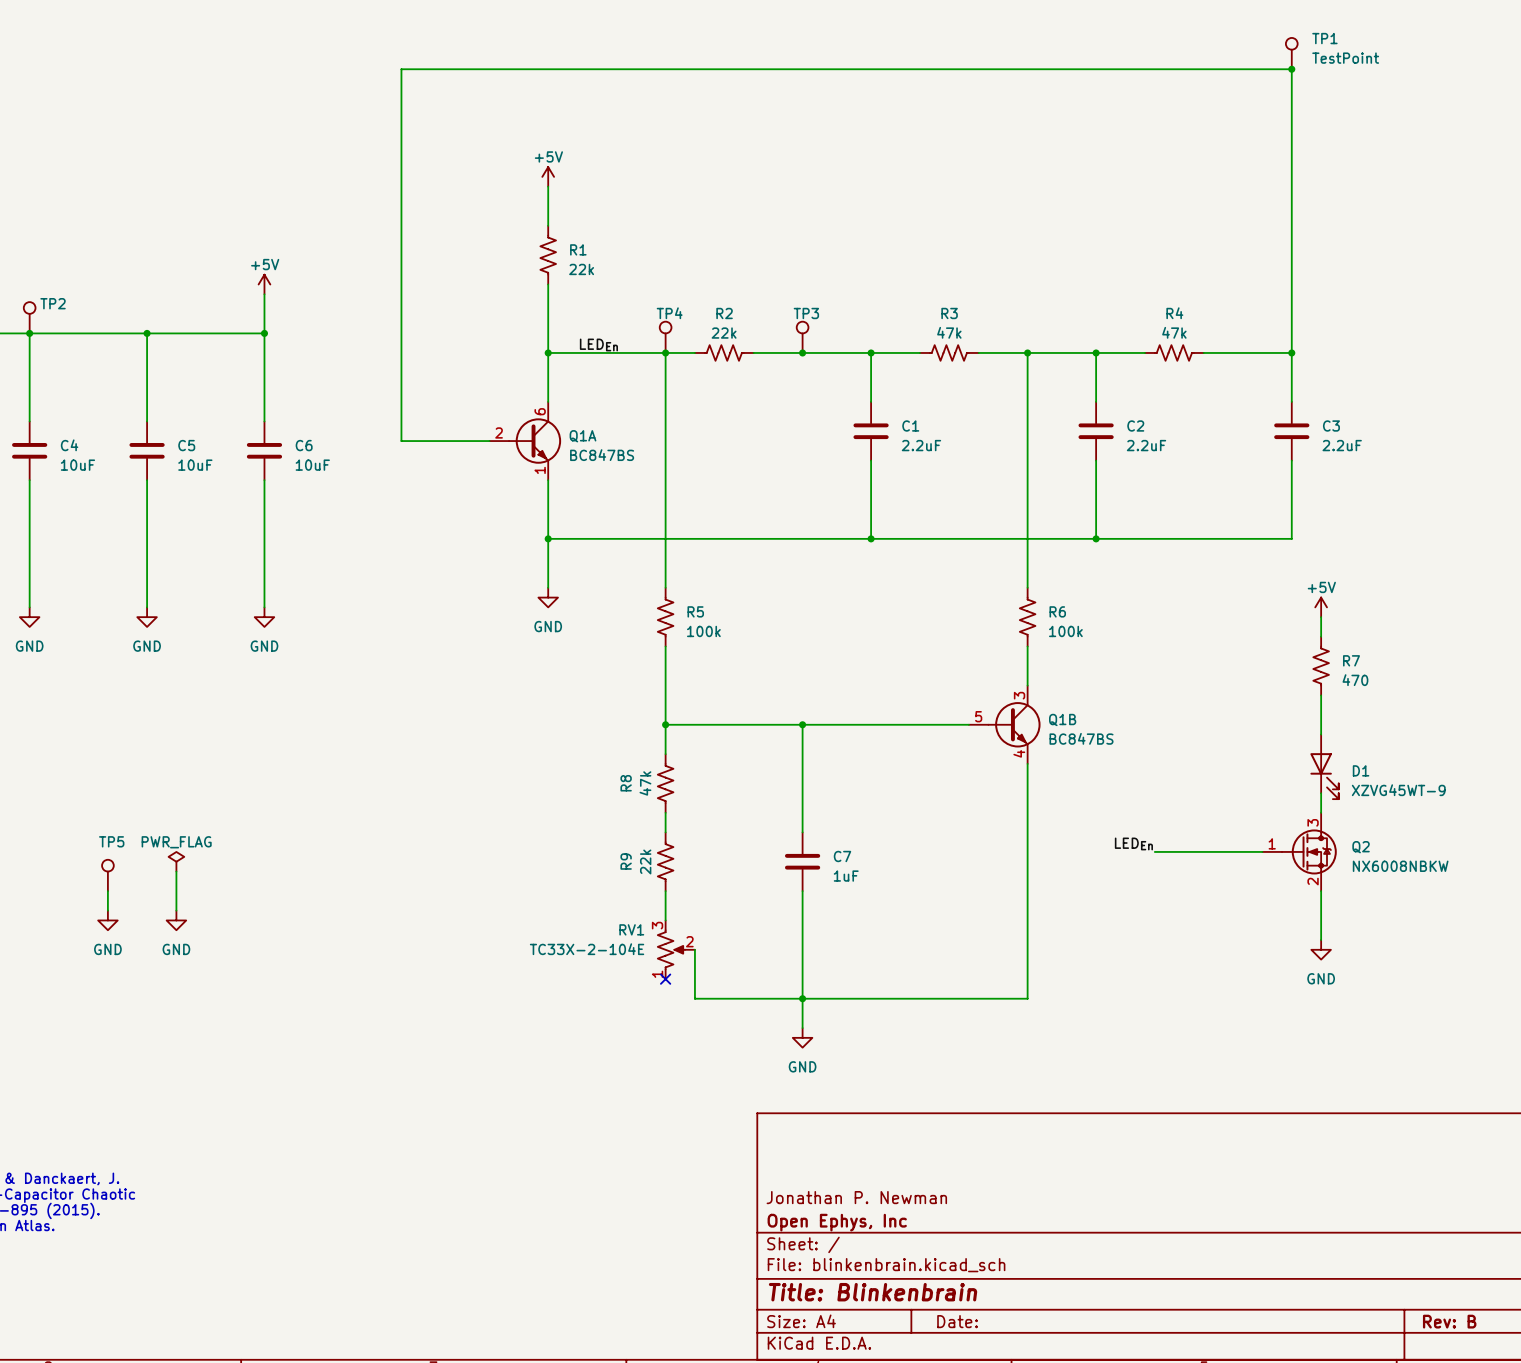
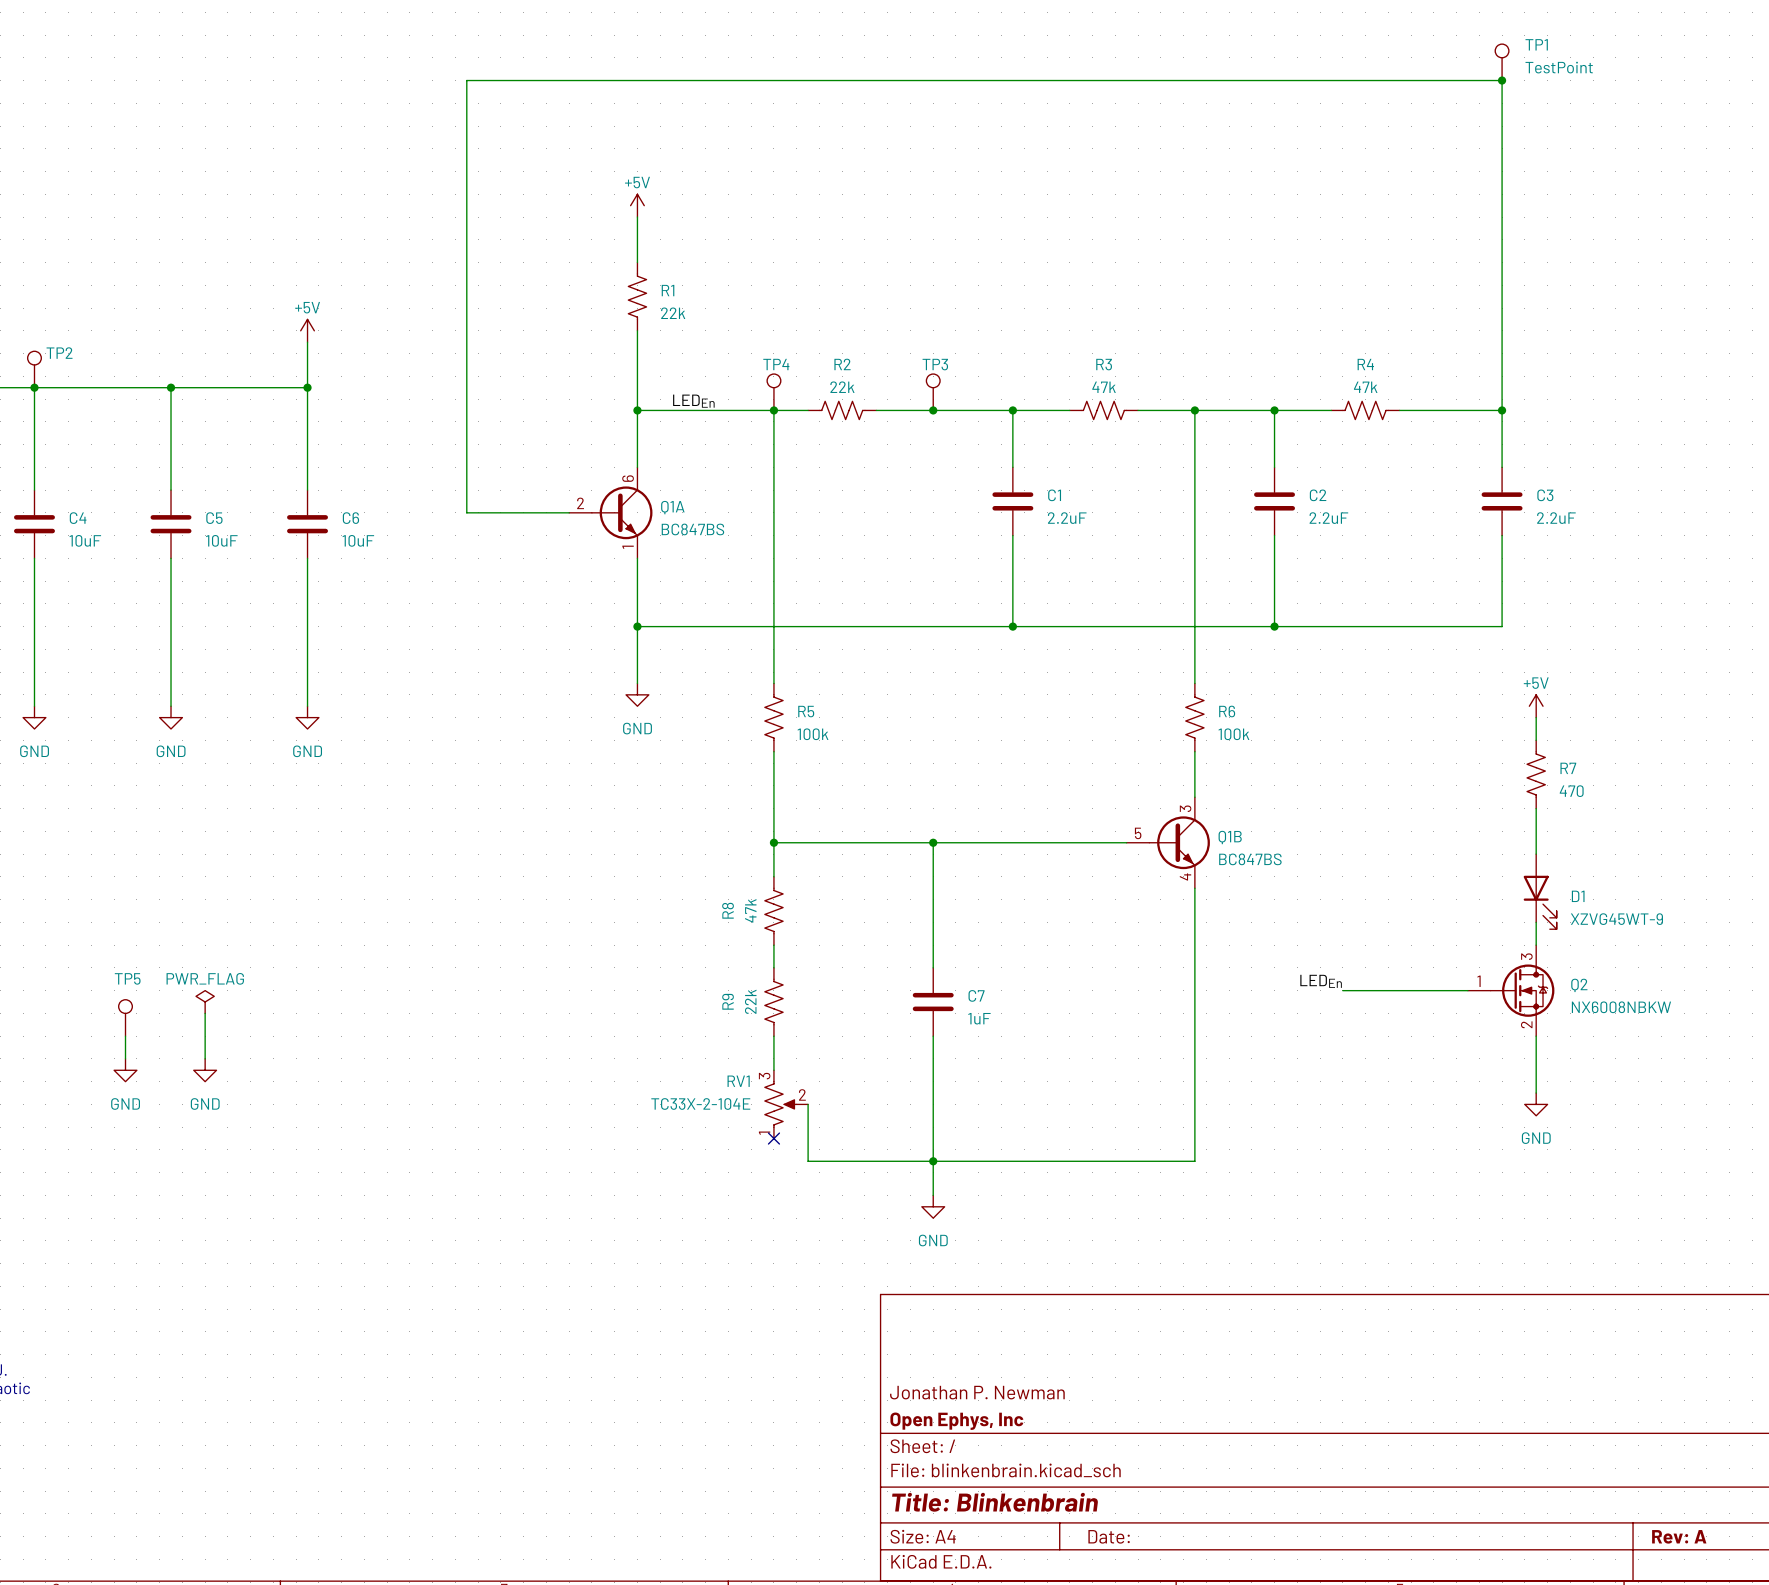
title block: Rev: B (1449, 1321) -> Rev: A (1679, 1536)

